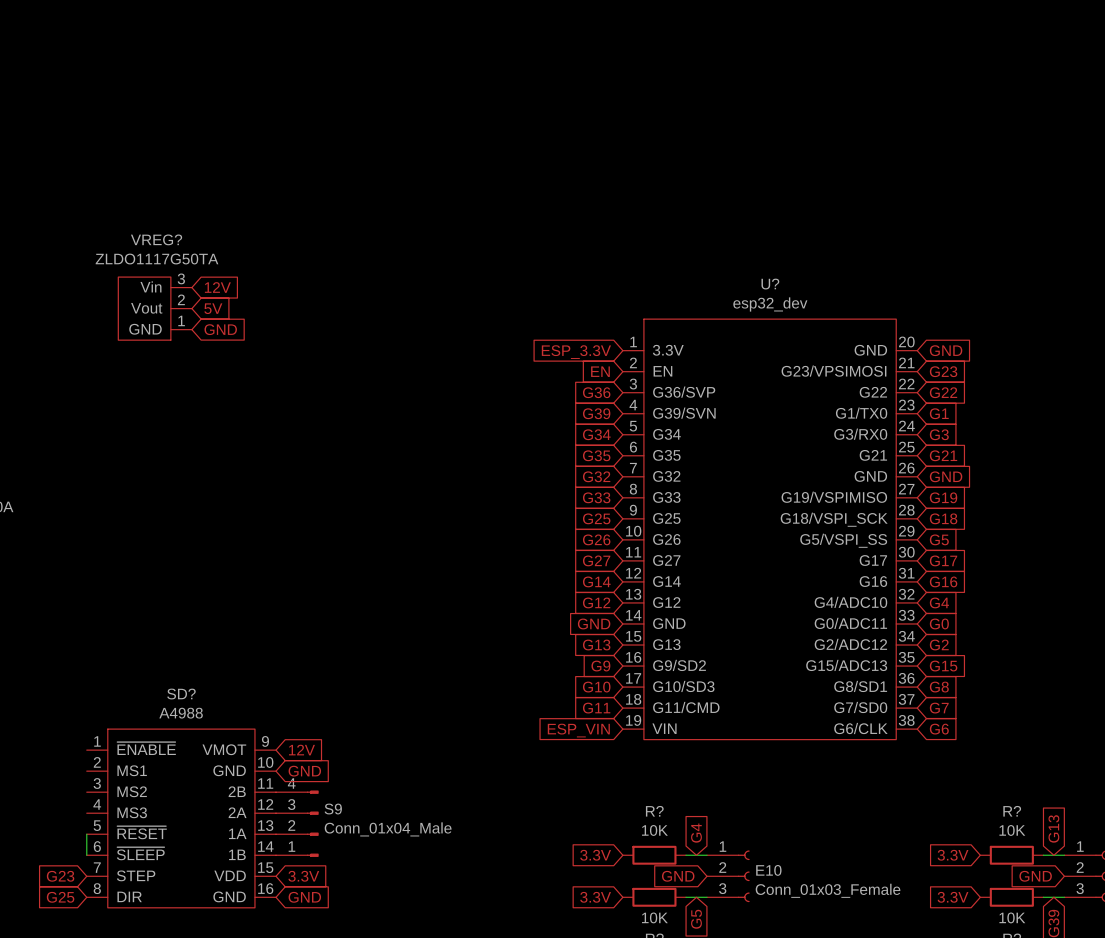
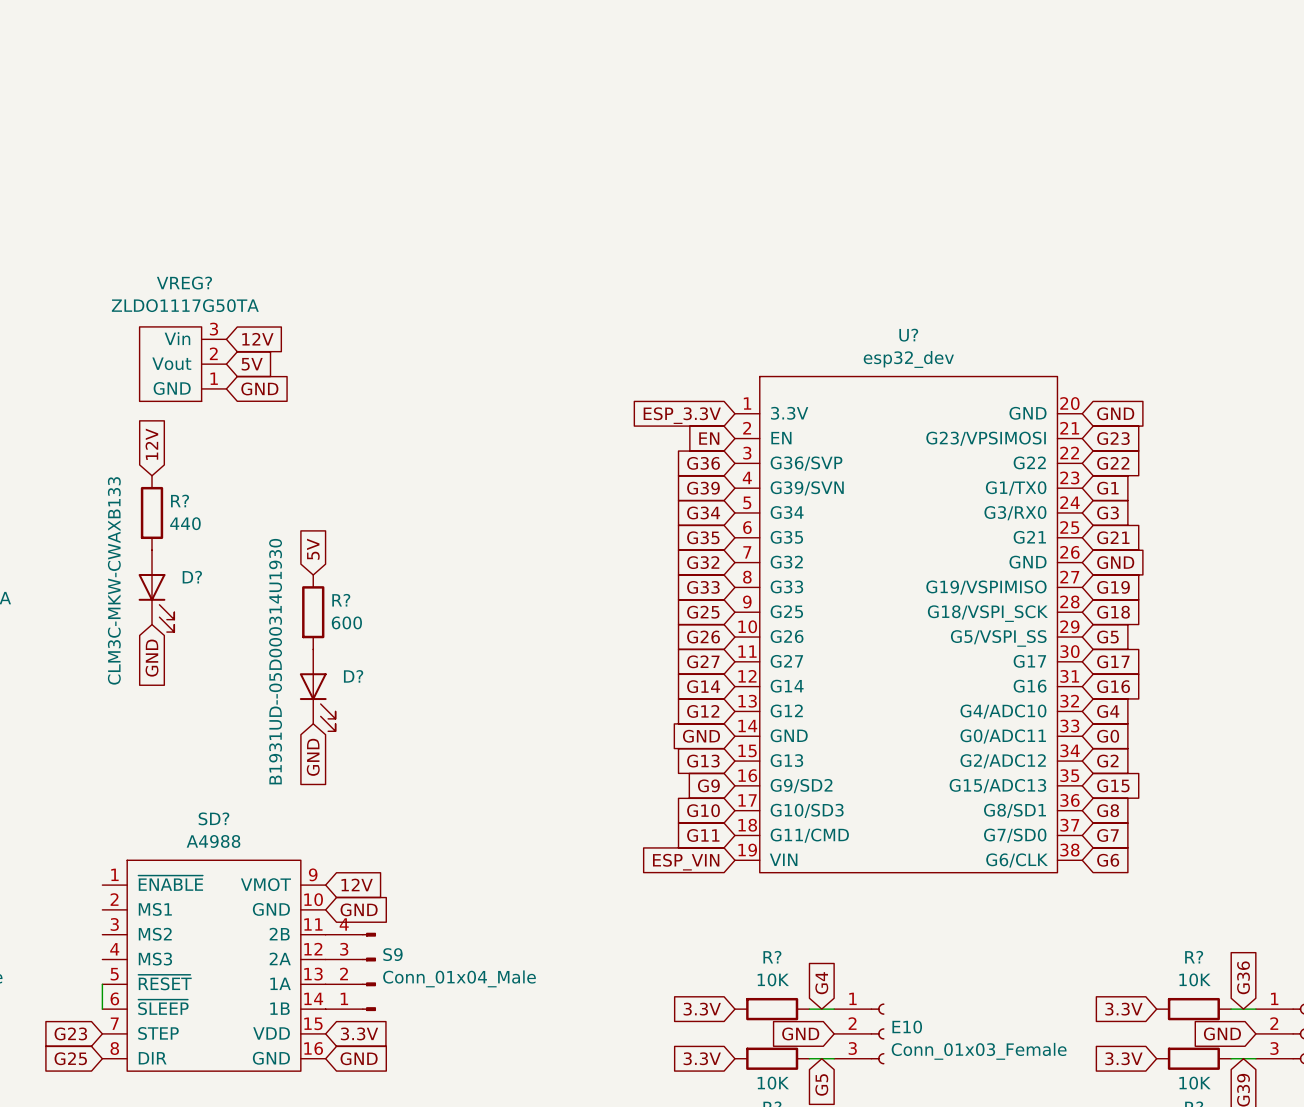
global label: none -> 12V (151, 444)
R?: none -> 440 (152, 512)
global label: none -> 5V (313, 549)
D?: none -> CLM3C-MKW-CWAXB133 (156, 591)
R?: none -> 600 (313, 612)
global label: none -> GND (152, 658)
D?: none -> B1931UD--05D000314U1930 (317, 690)
global label: none -> GND (313, 757)
global label: G13 (1053, 828) -> G36 (1243, 977)

